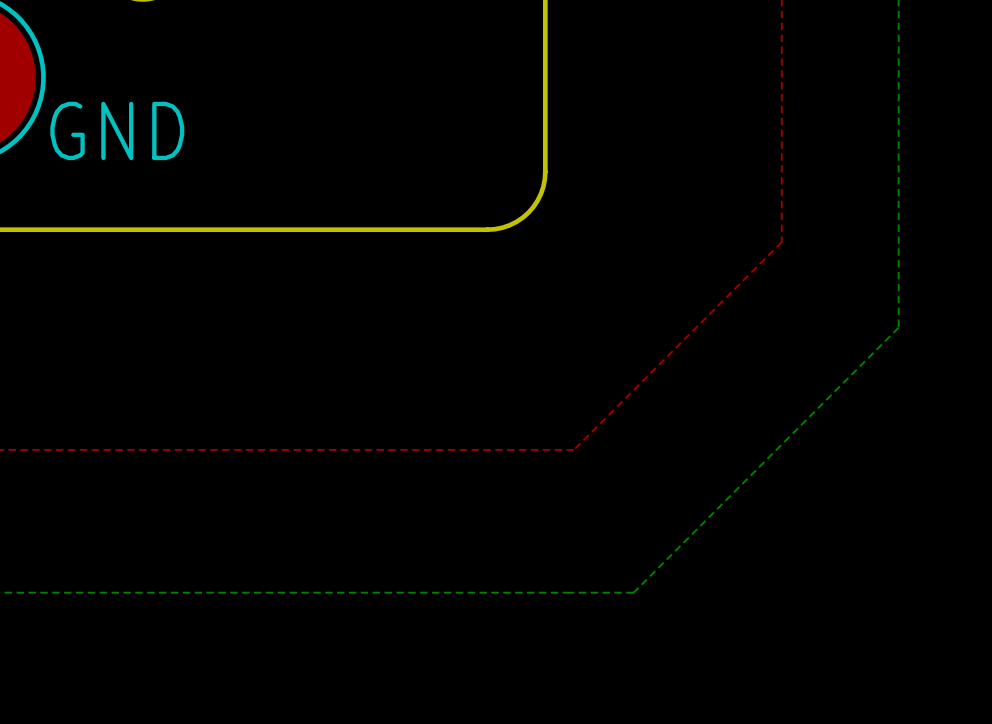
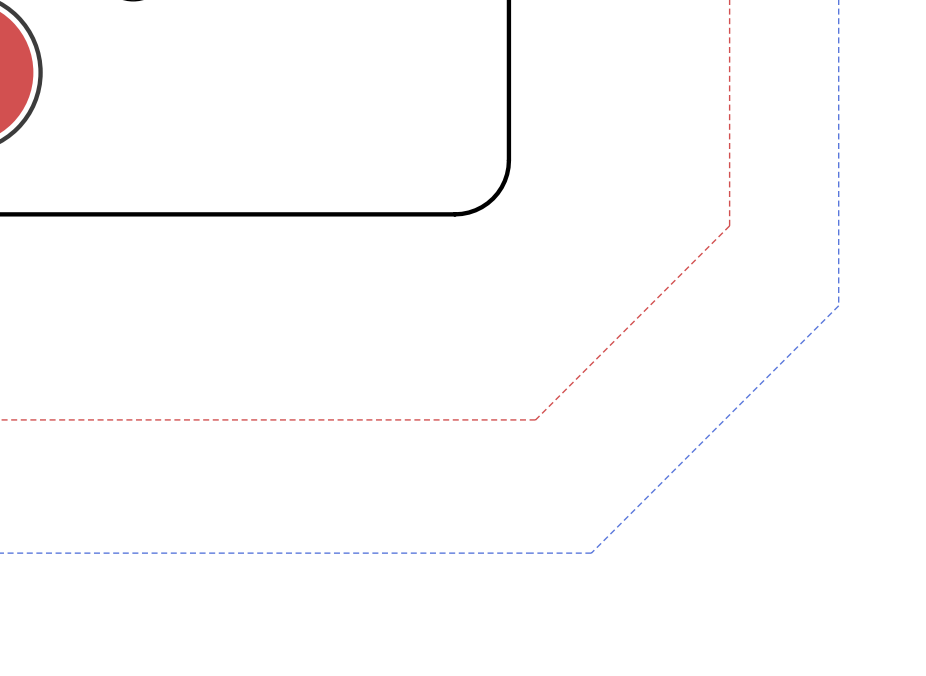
text: GND (117, 130) -> none

